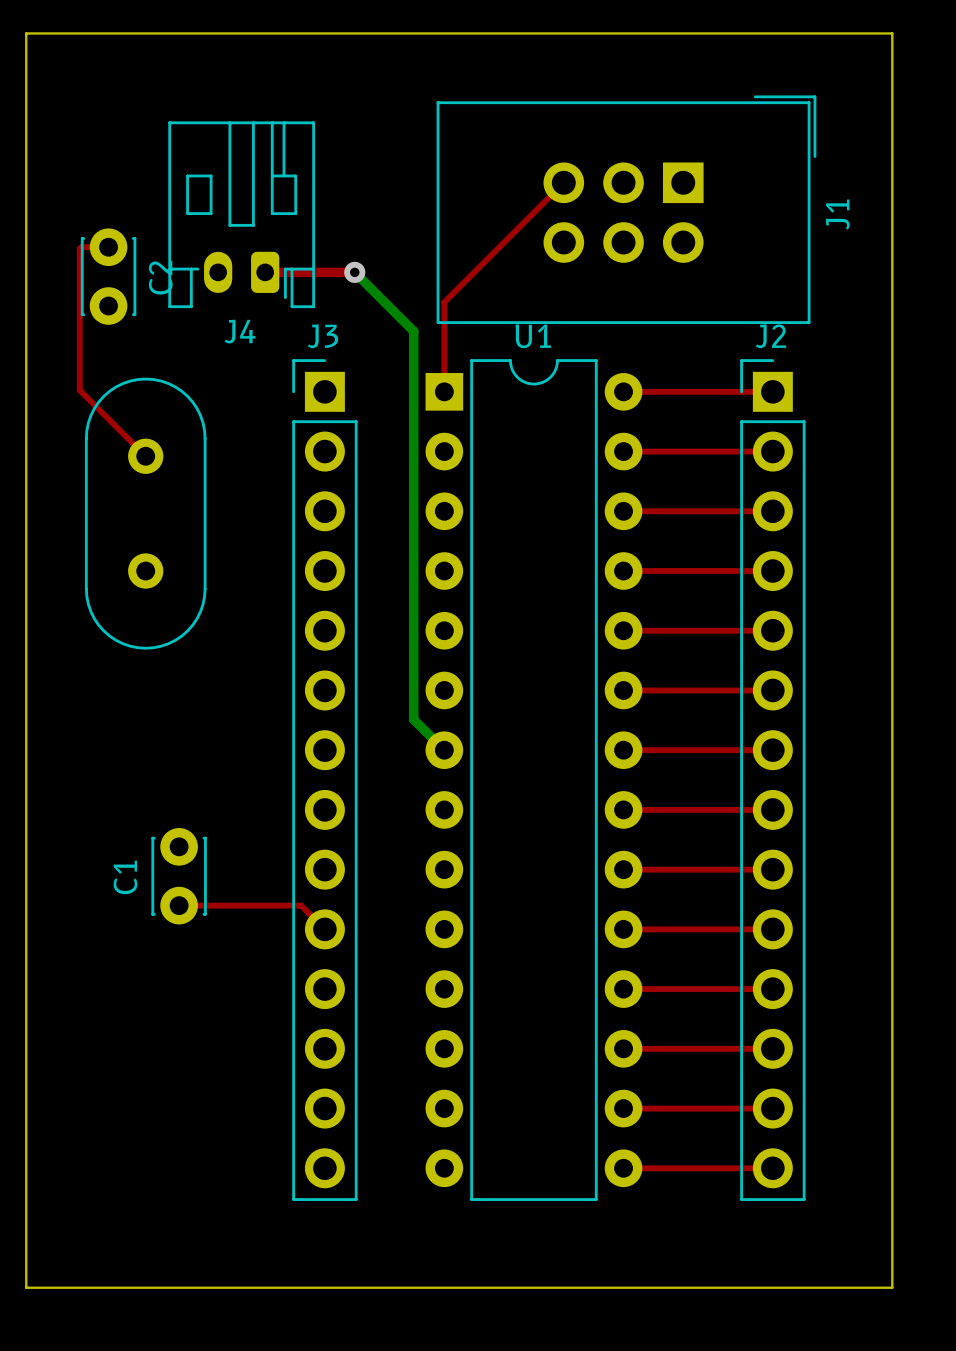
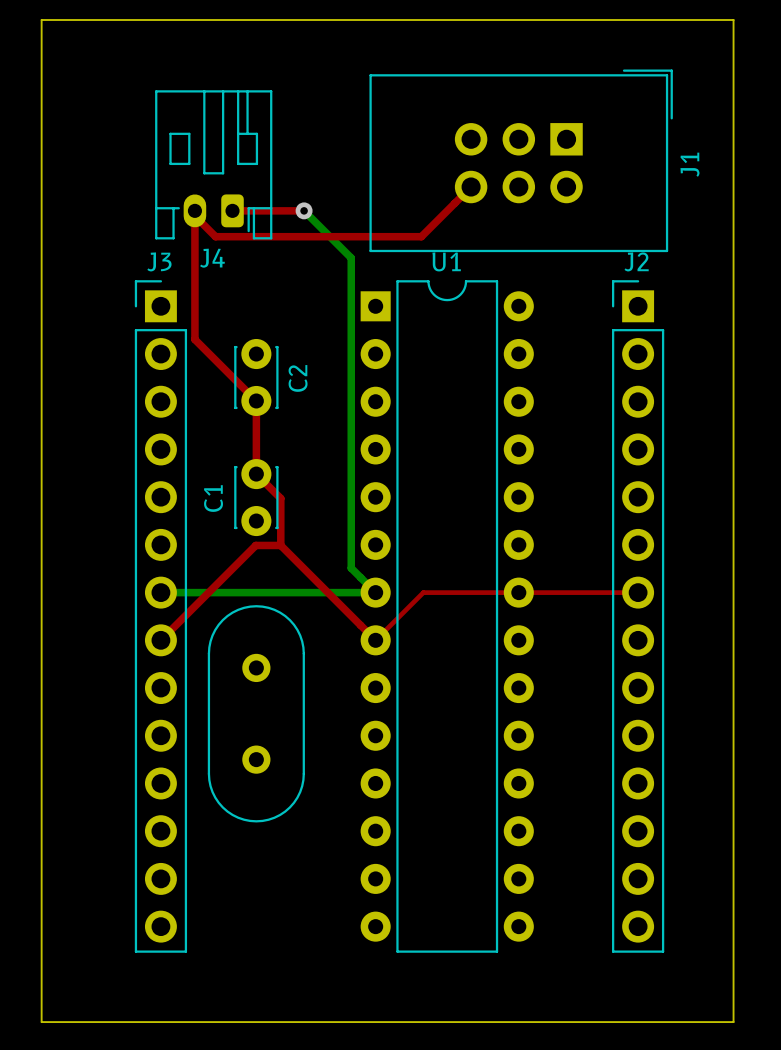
top track: (563, 182) (444, 302) (444, 391) -> none
top track: none -> (471, 187) (421, 236) (215, 236) (194, 216) (194, 339) (256, 400) (256, 474) (280, 498) (280, 545)
top track: (108, 247) (79, 248) (79, 390) (145, 456) -> none
C2 position: (108, 276) -> (256, 377)
top track: (623, 391) (772, 391) -> none
top track: (623, 451) (772, 451) -> none
top track: (623, 511) (772, 511) -> none
part position: (145, 513) -> (256, 713)
top track: (623, 571) (772, 571) -> none
top track: (623, 630) (772, 630) -> none
top track: (623, 690) (772, 690) -> none
top track: none -> (280, 545) (375, 640) (423, 592) (518, 592)
top track: none -> (280, 545) (255, 545) (160, 640)
bottom track: none -> (160, 592) (375, 592)
J3 position: (324, 780) -> (160, 616)
top track: (623, 809) (772, 809) -> none
top track: (623, 869) (772, 869) -> none
C1 position: (179, 876) -> (256, 497)
top track: (179, 905) (301, 905) (324, 929) -> none
top track: (623, 929) (772, 929) -> none
top track: (623, 989) (772, 989) -> none
top track: (623, 1048) (772, 1048) -> none
top track: (623, 1108) (772, 1108) -> none
top track: (623, 1168) (772, 1168) -> none

